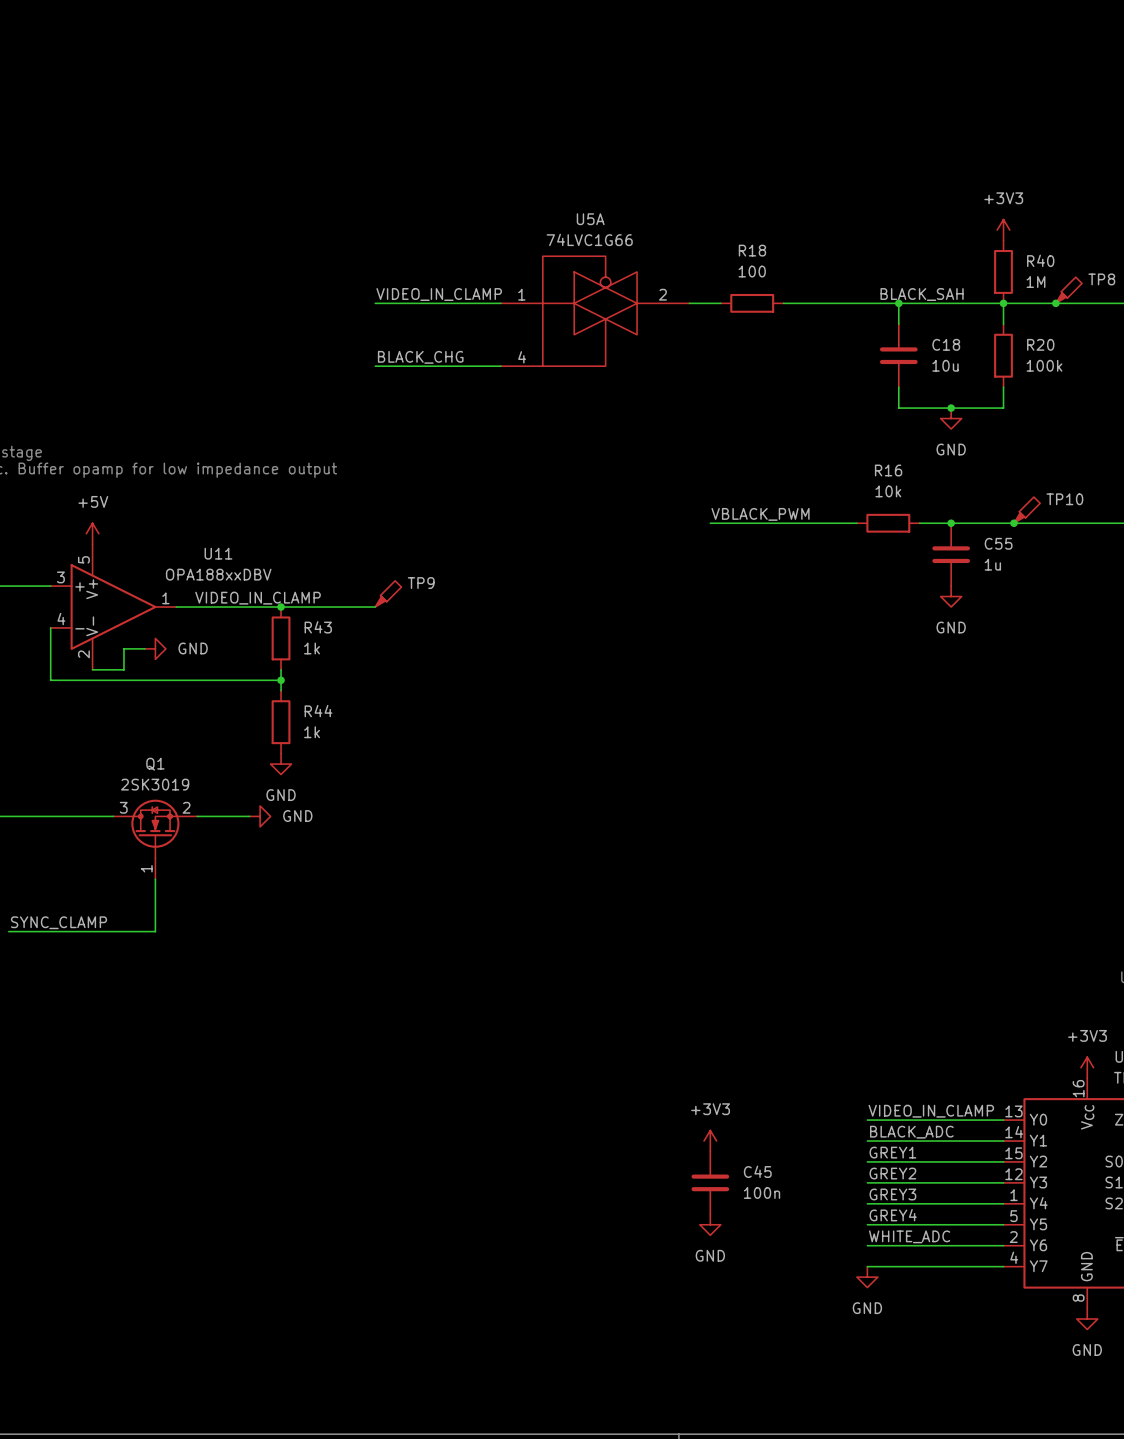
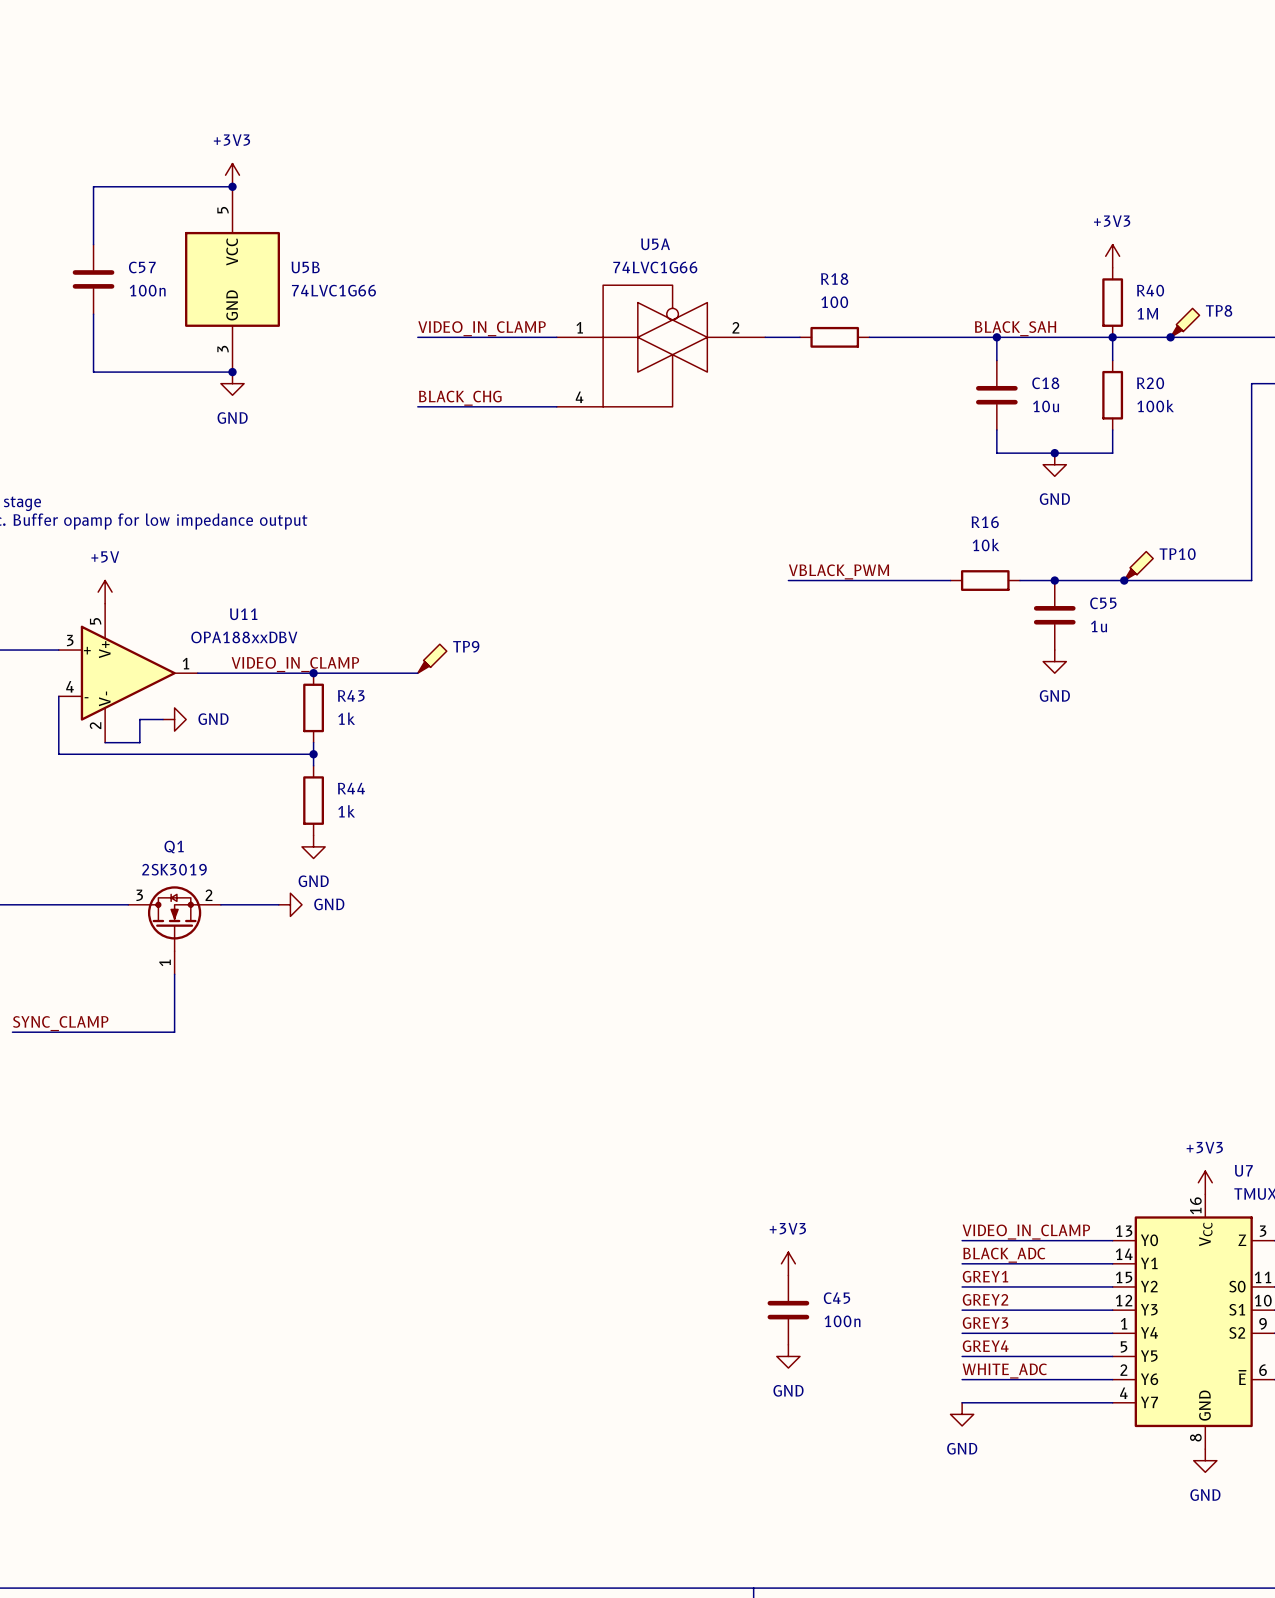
power symbol: none -> +3V3 (232, 175)
wire: none -> (232, 186) (93, 186) (93, 244)
junction: none -> (232, 186)
C57: none -> 100n (93, 279)
U5B: none -> 74LVC1G66 (232, 279)
wire: none -> (93, 314) (93, 372) (232, 372)
junction: none -> (232, 372)
power symbol: none -> GND (232, 383)

